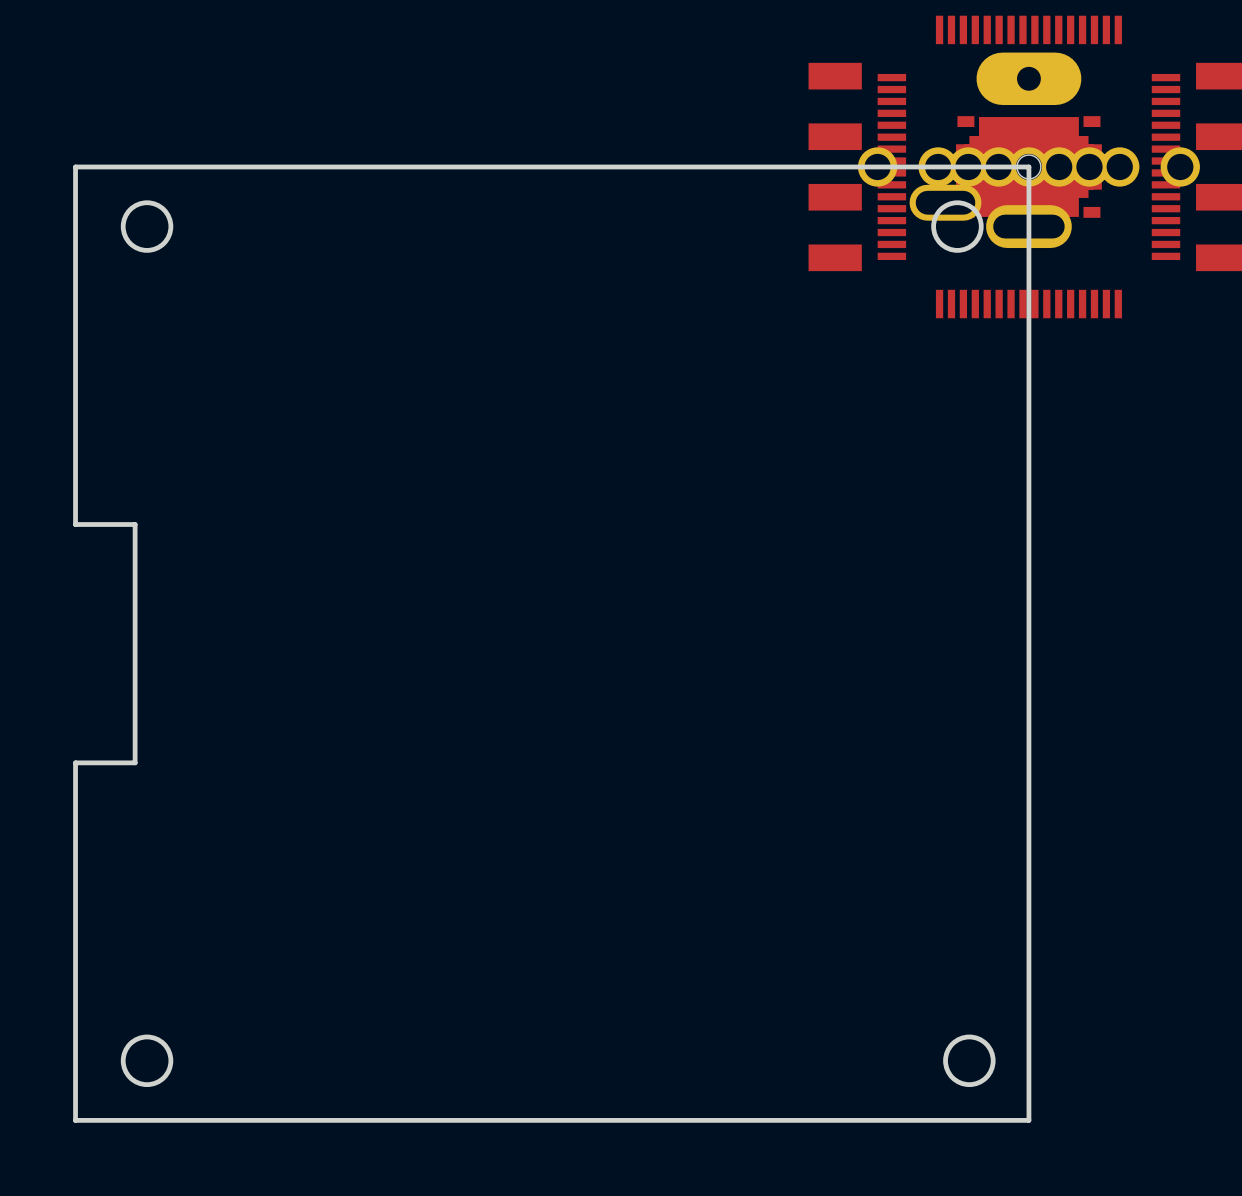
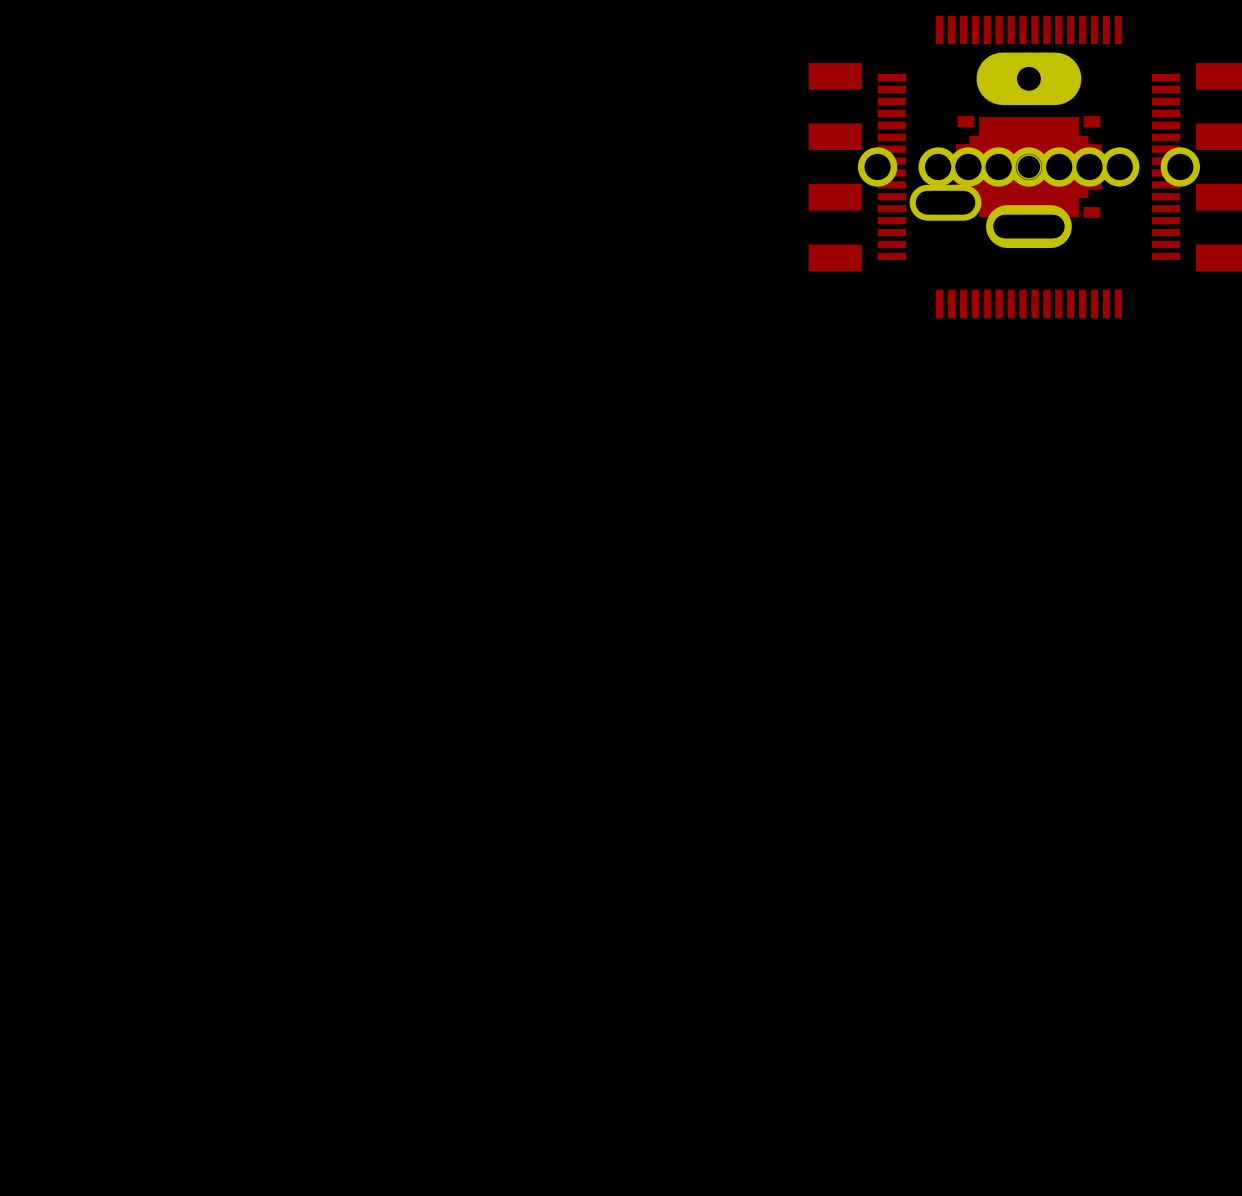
board edge: (1028, 166) (75, 166) (75, 524) (135, 524) (135, 762) (75, 762) (75, 1120) (1028, 1120) (1028, 166) -> none
round board edge: [120, 200, 174, 253] -> none
round board edge: [931, 200, 984, 253] -> none
round board edge: [120, 1034, 174, 1088] -> none
round board edge: [943, 1034, 996, 1088] -> none

